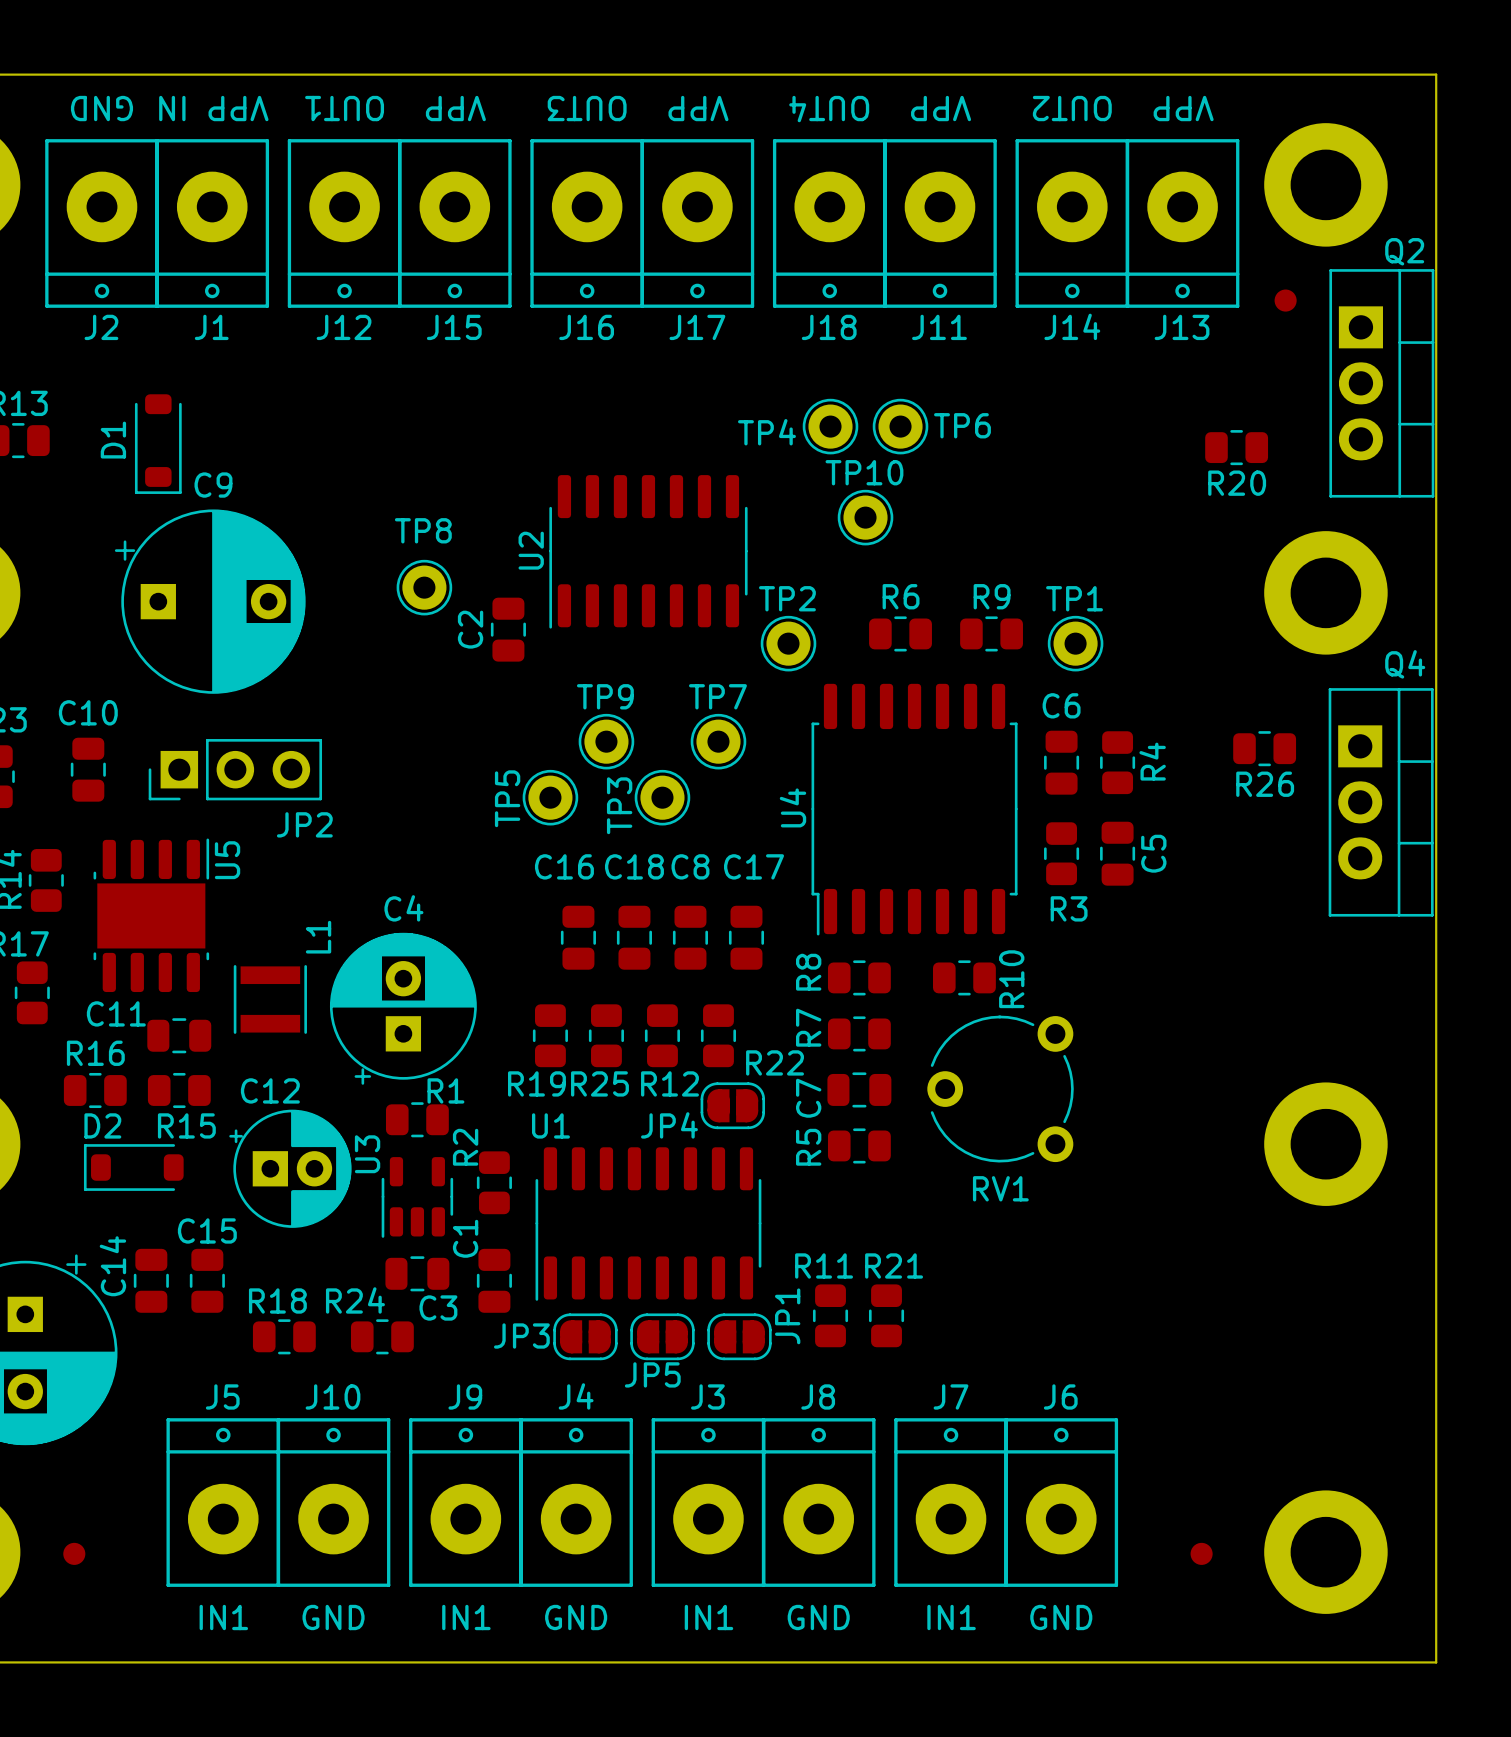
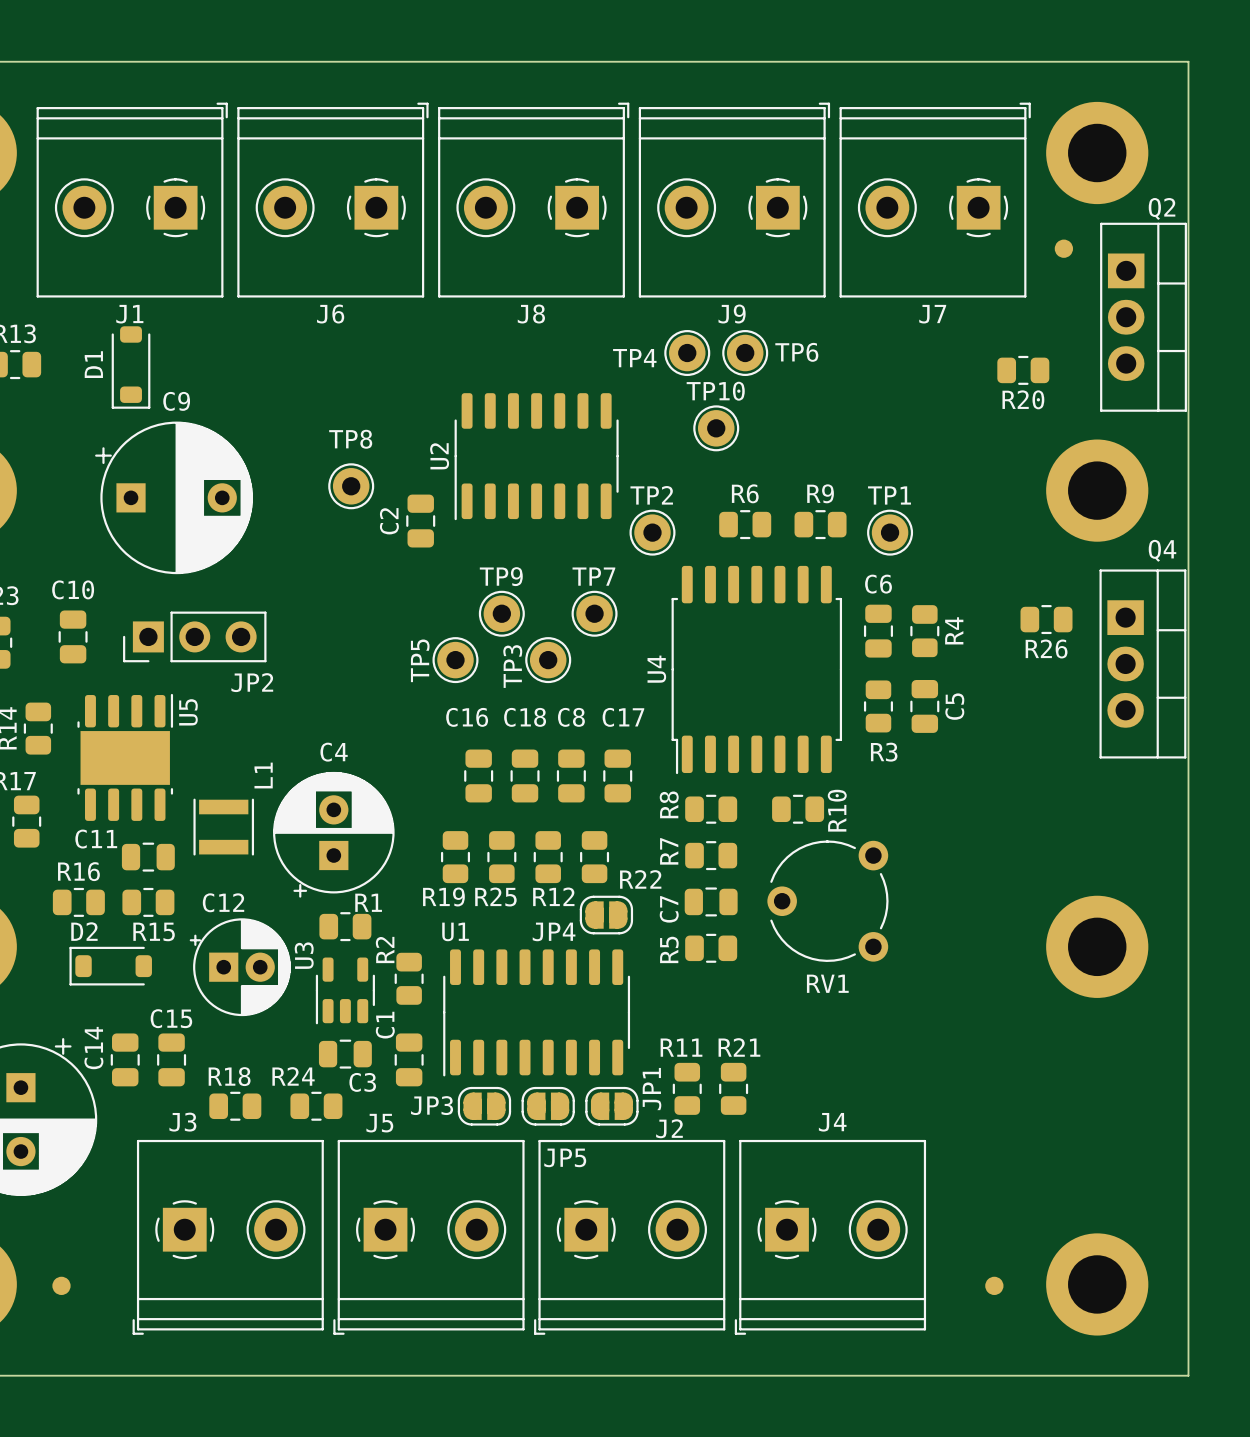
J2 footprint: [45, 139, 159, 308] -> [534, 1139, 726, 1335]
J1 footprint: [155, 139, 270, 308] -> [36, 102, 228, 298]
J12: (344, 223) -> none
J15: (454, 223) -> none
J16: (587, 223) -> none
J17: (697, 223) -> none
J18: (829, 223) -> none
J11: (940, 223) -> none
J14: (1072, 223) -> none
J13: (1182, 223) -> none
J2 name position: J2 (101, 327) -> J2 (669, 1128)
JP5 name position: JP5 (652, 1374) -> JP5 (565, 1157)
J5 name position: J5 (222, 1396) -> J5 (379, 1123)
J9 name position: J9 (465, 1396) -> J9 (732, 314)
J3 name position: J3 (707, 1396) -> J3 (182, 1122)
J8 name position: J8 (818, 1396) -> J8 (531, 314)
J7 name position: J7 (951, 1396) -> J7 (932, 314)
J6 name position: J6 (1060, 1396) -> J6 (330, 314)
J5 footprint: [166, 1418, 281, 1587] -> [333, 1139, 525, 1335]
J9 footprint: [409, 1418, 523, 1587] -> [638, 102, 831, 298]
J4 footprint: [519, 1418, 633, 1587] -> [734, 1139, 927, 1335]
J3 footprint: [651, 1418, 766, 1587] -> [132, 1139, 324, 1335]
J8 footprint: [761, 1418, 876, 1587] -> [438, 102, 630, 298]
J7 footprint: [894, 1418, 1008, 1587] -> [839, 102, 1031, 298]
J6 footprint: [1004, 1418, 1119, 1587] -> [237, 102, 429, 298]
J10: (333, 1502) -> none

